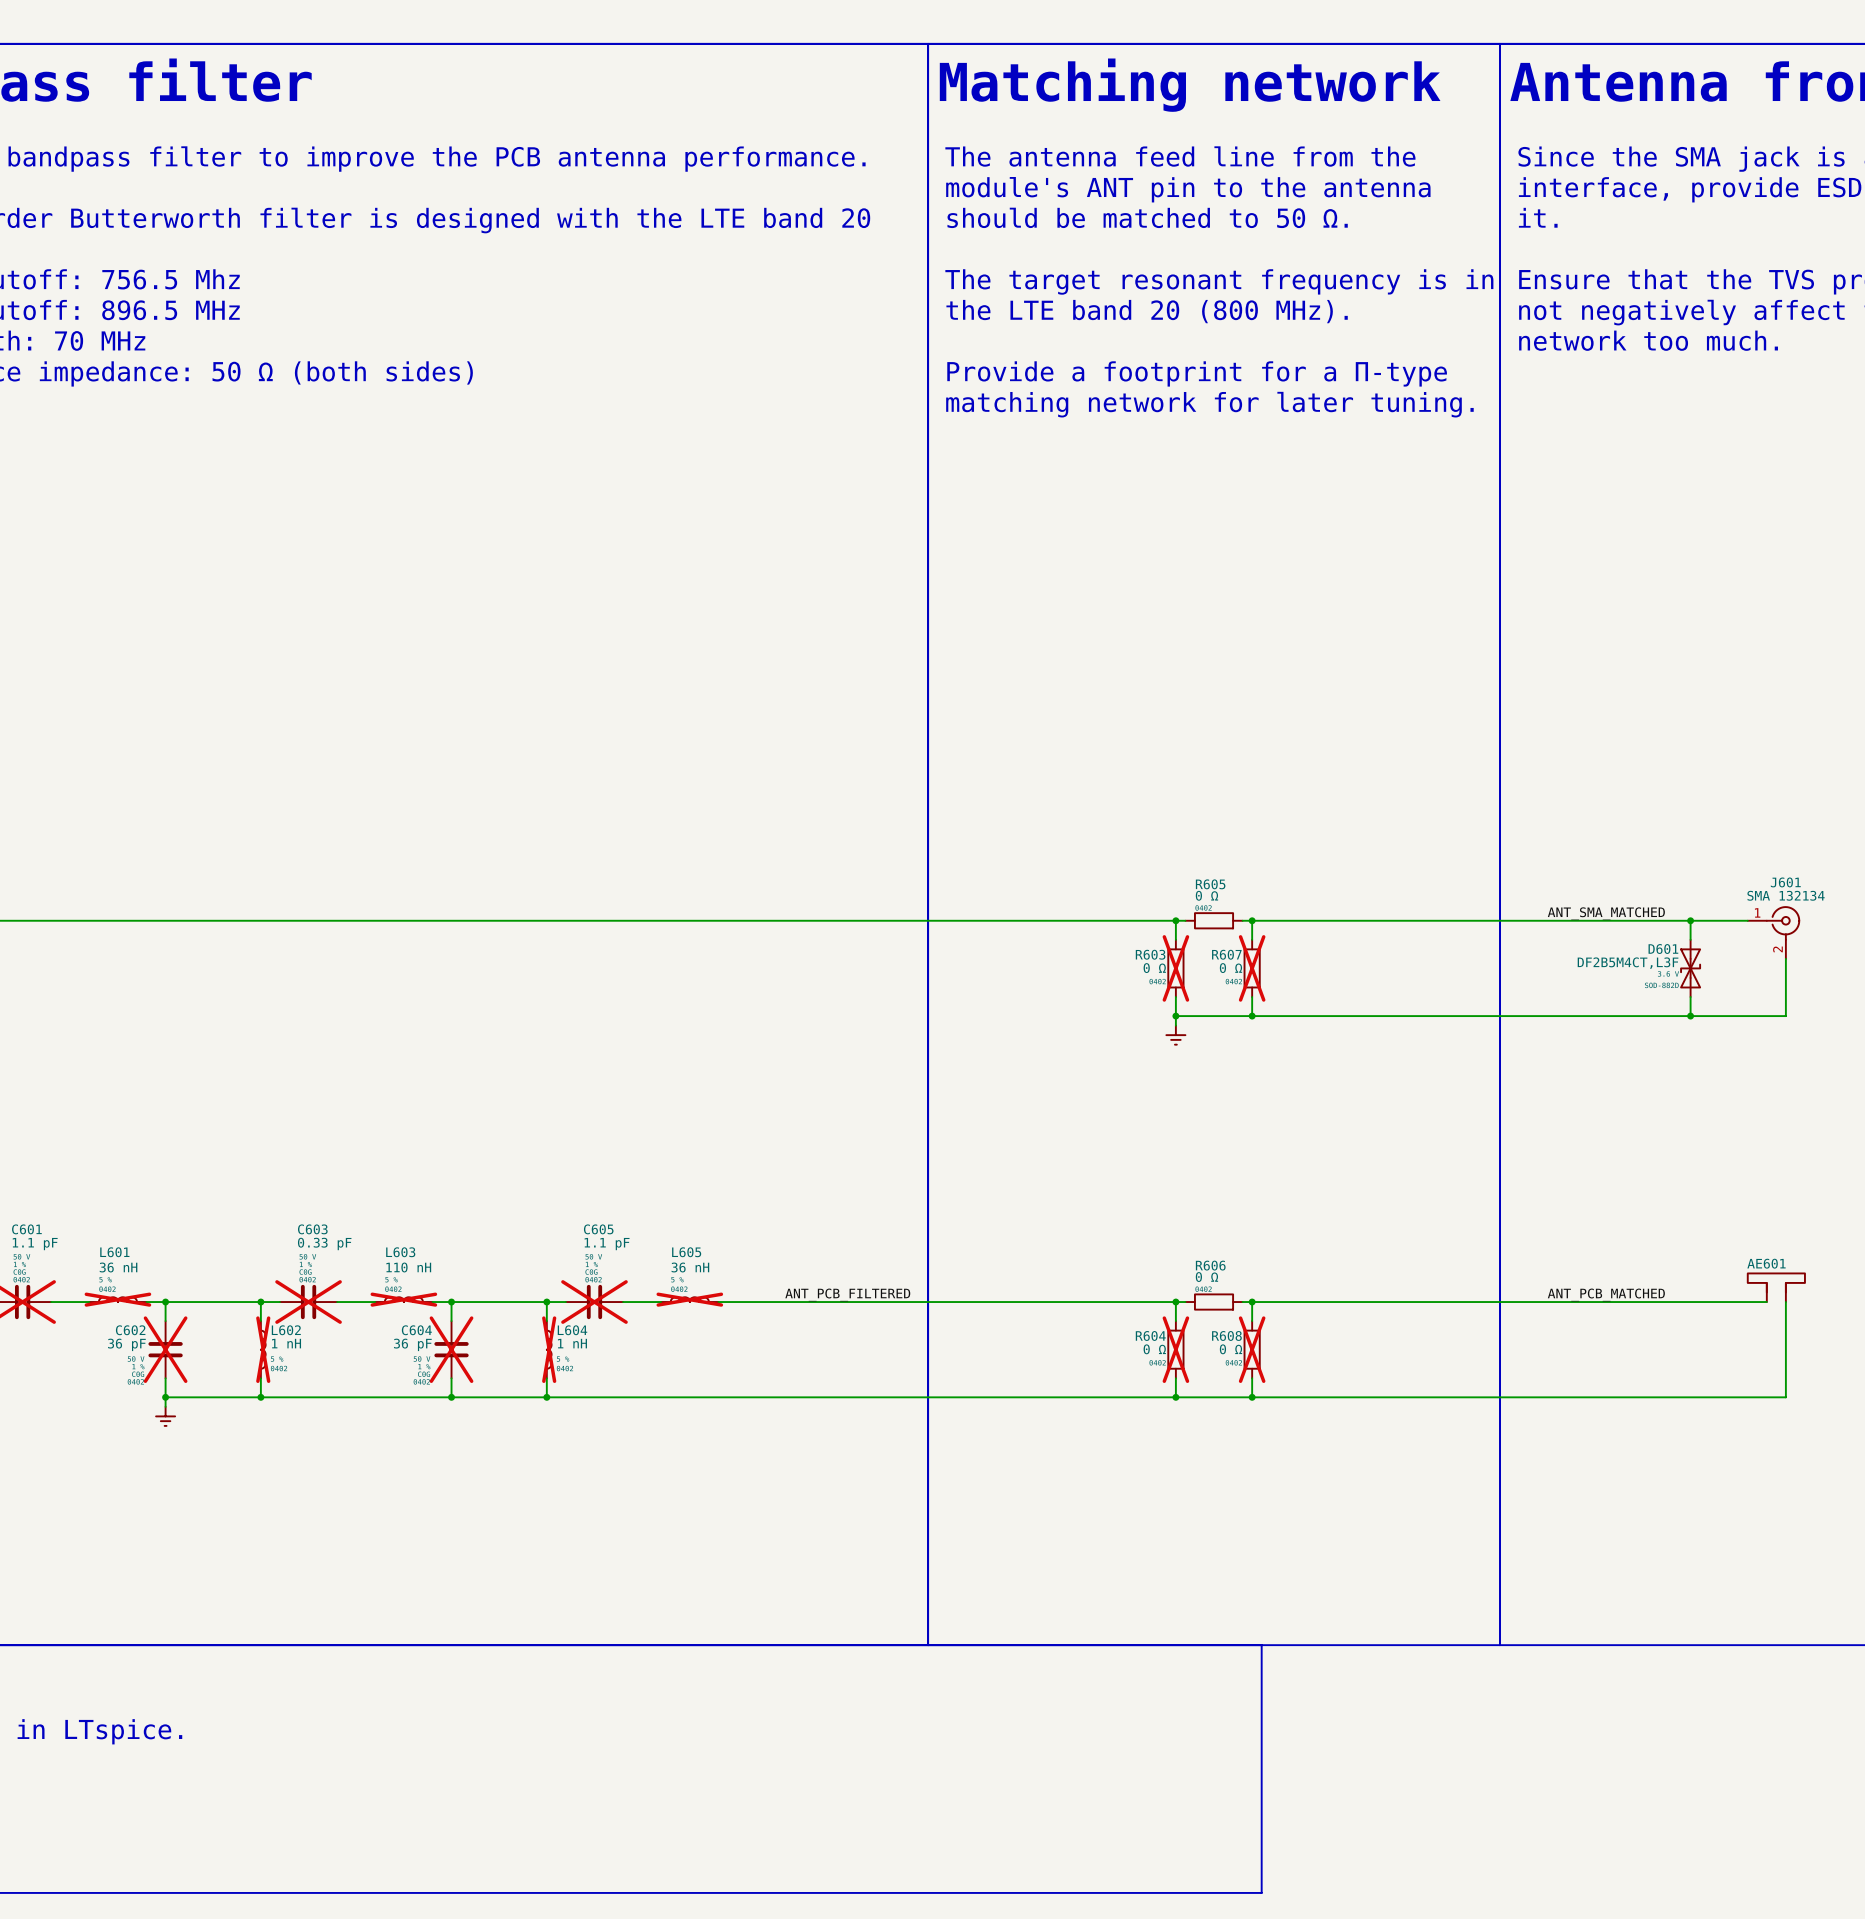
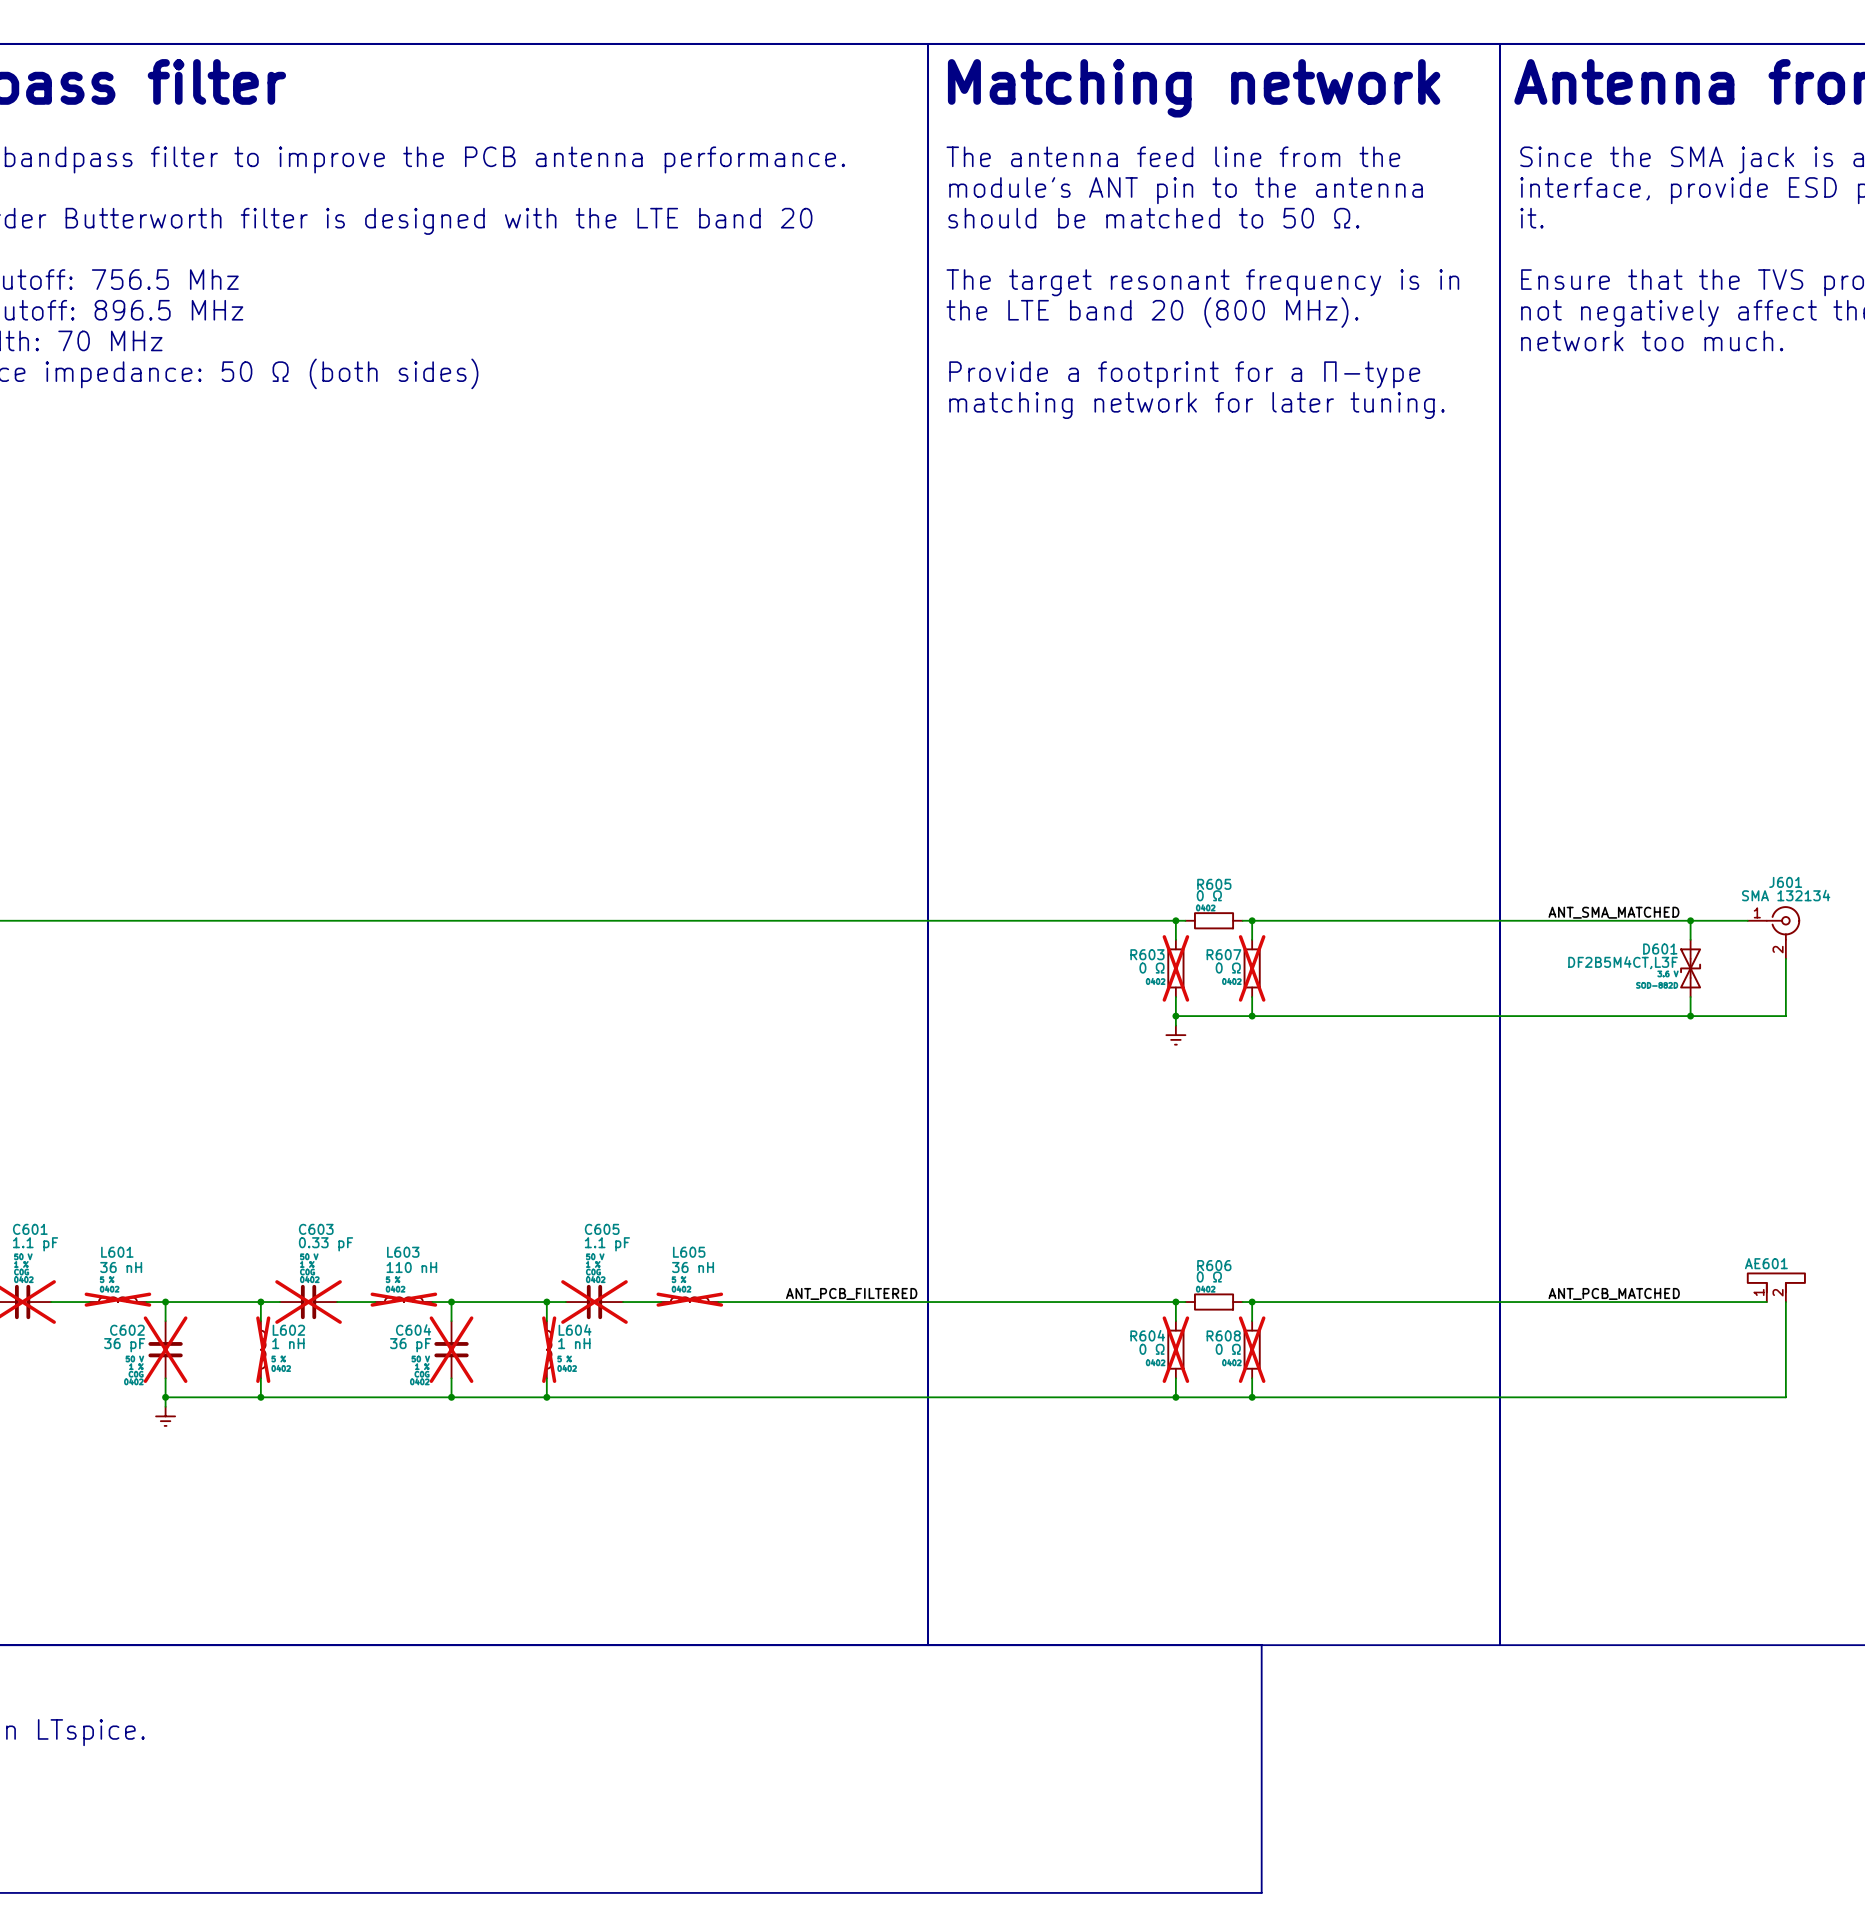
AE601 pin number: none -> 1 (1758, 1292)
AE601 pin number: none -> 2 (1778, 1292)

